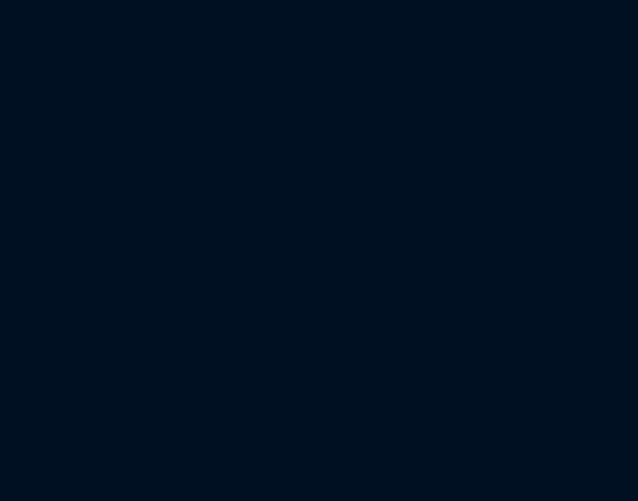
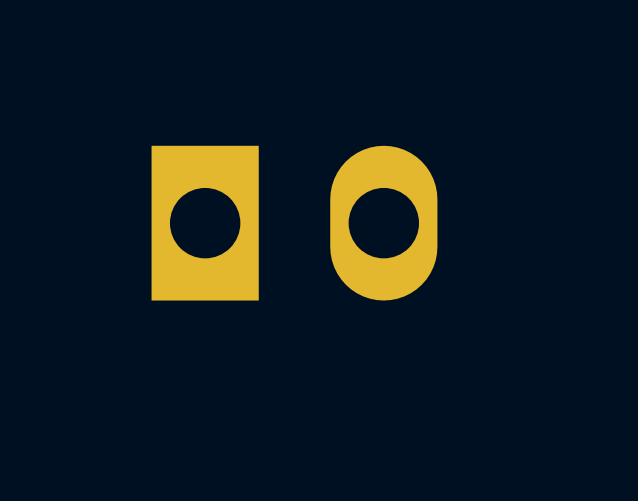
part: none -> (294, 223)

